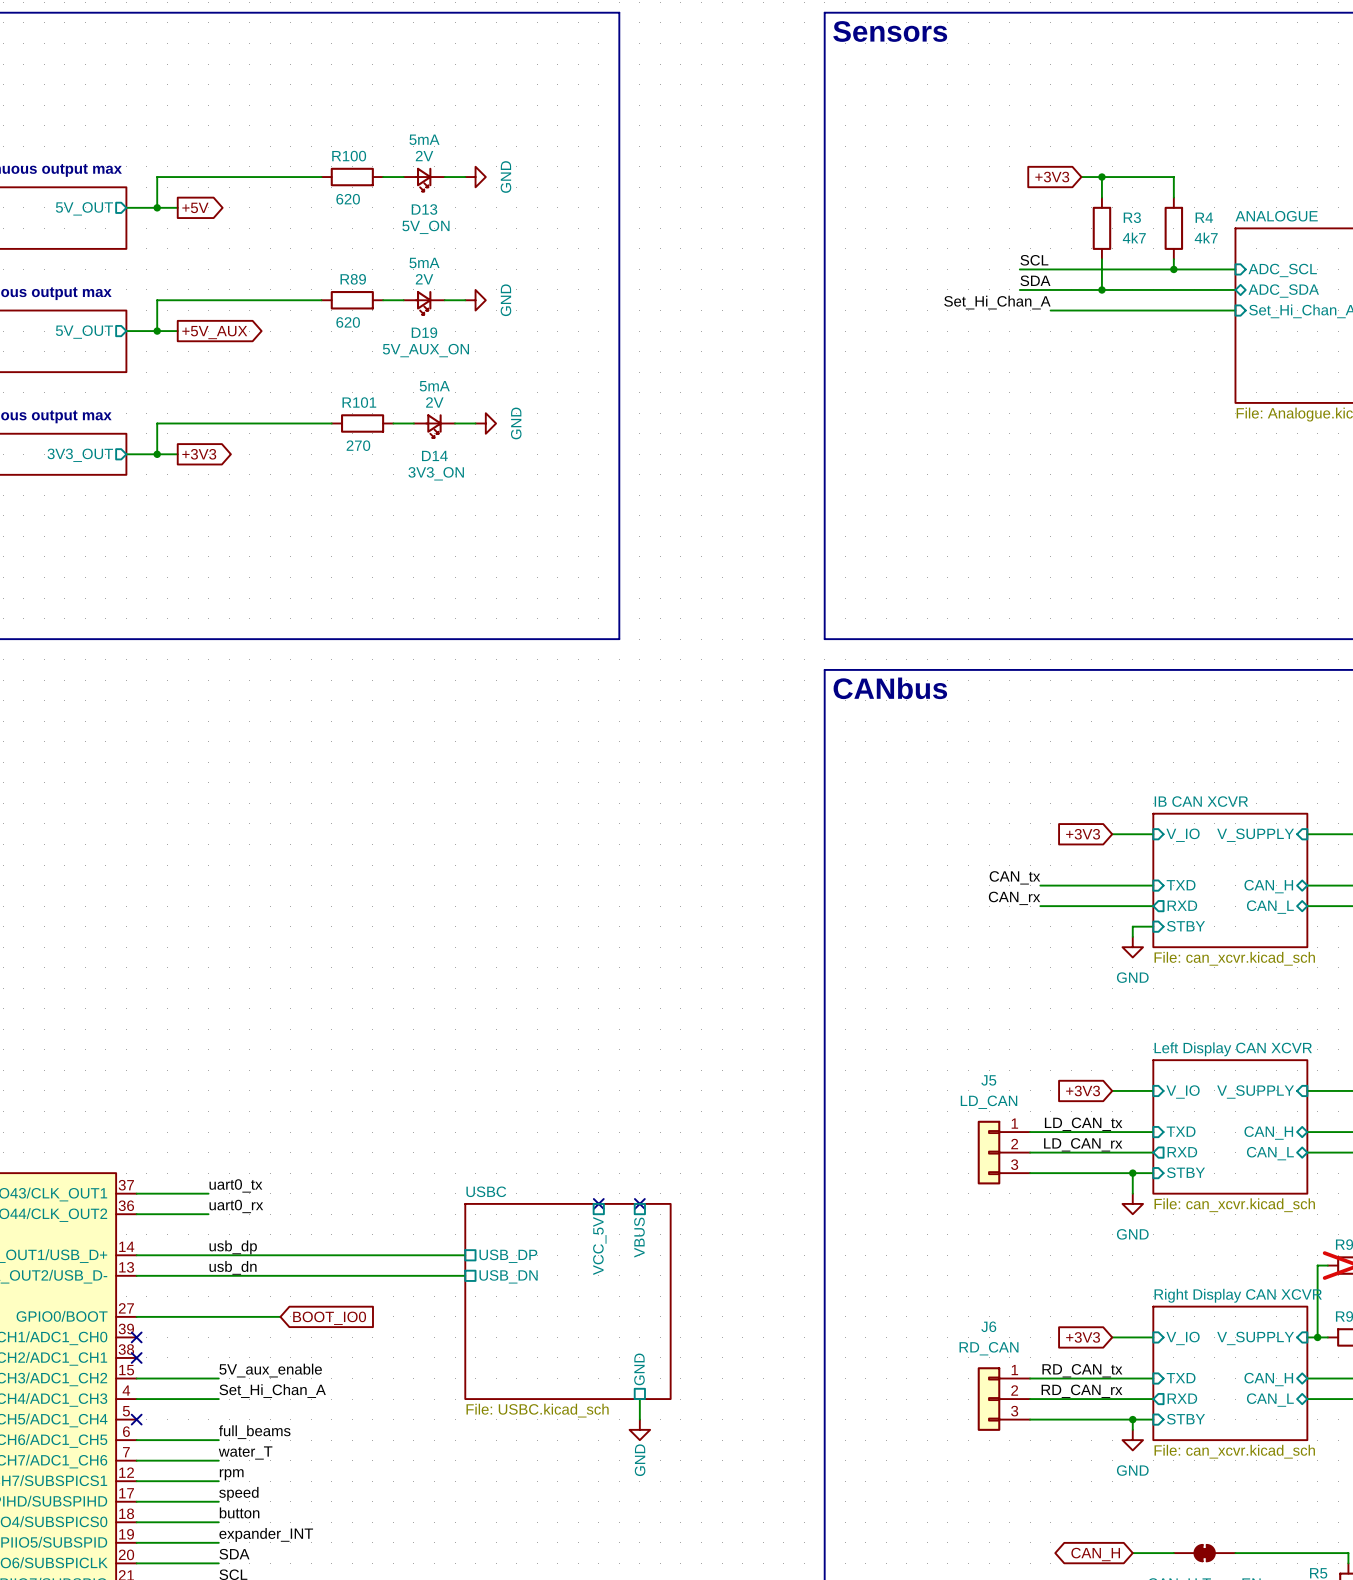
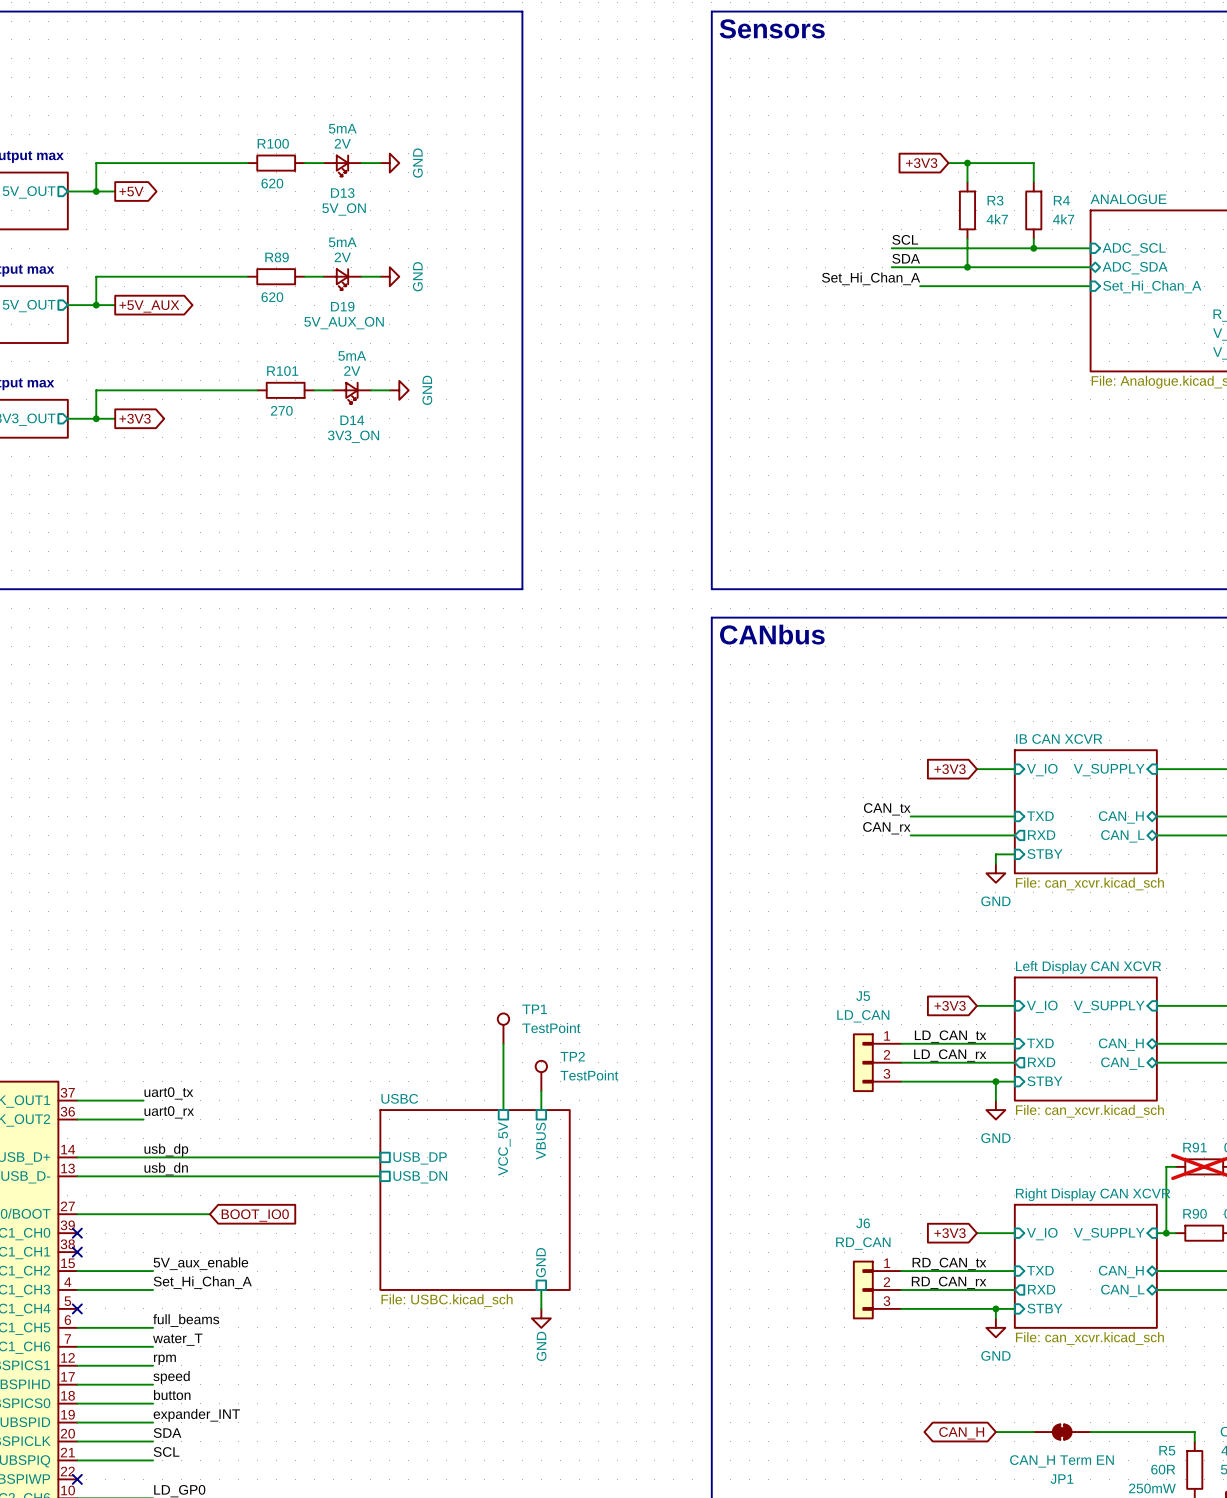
TP1: none -> TestPoint (503, 1028)
wire: none -> (503, 1043) (503, 1110)
TP2: none -> TestPoint (541, 1075)
wire: none -> (541, 1091) (541, 1110)
no-connect mark: (598, 1203) -> none
no-connect mark: (639, 1203) -> none

